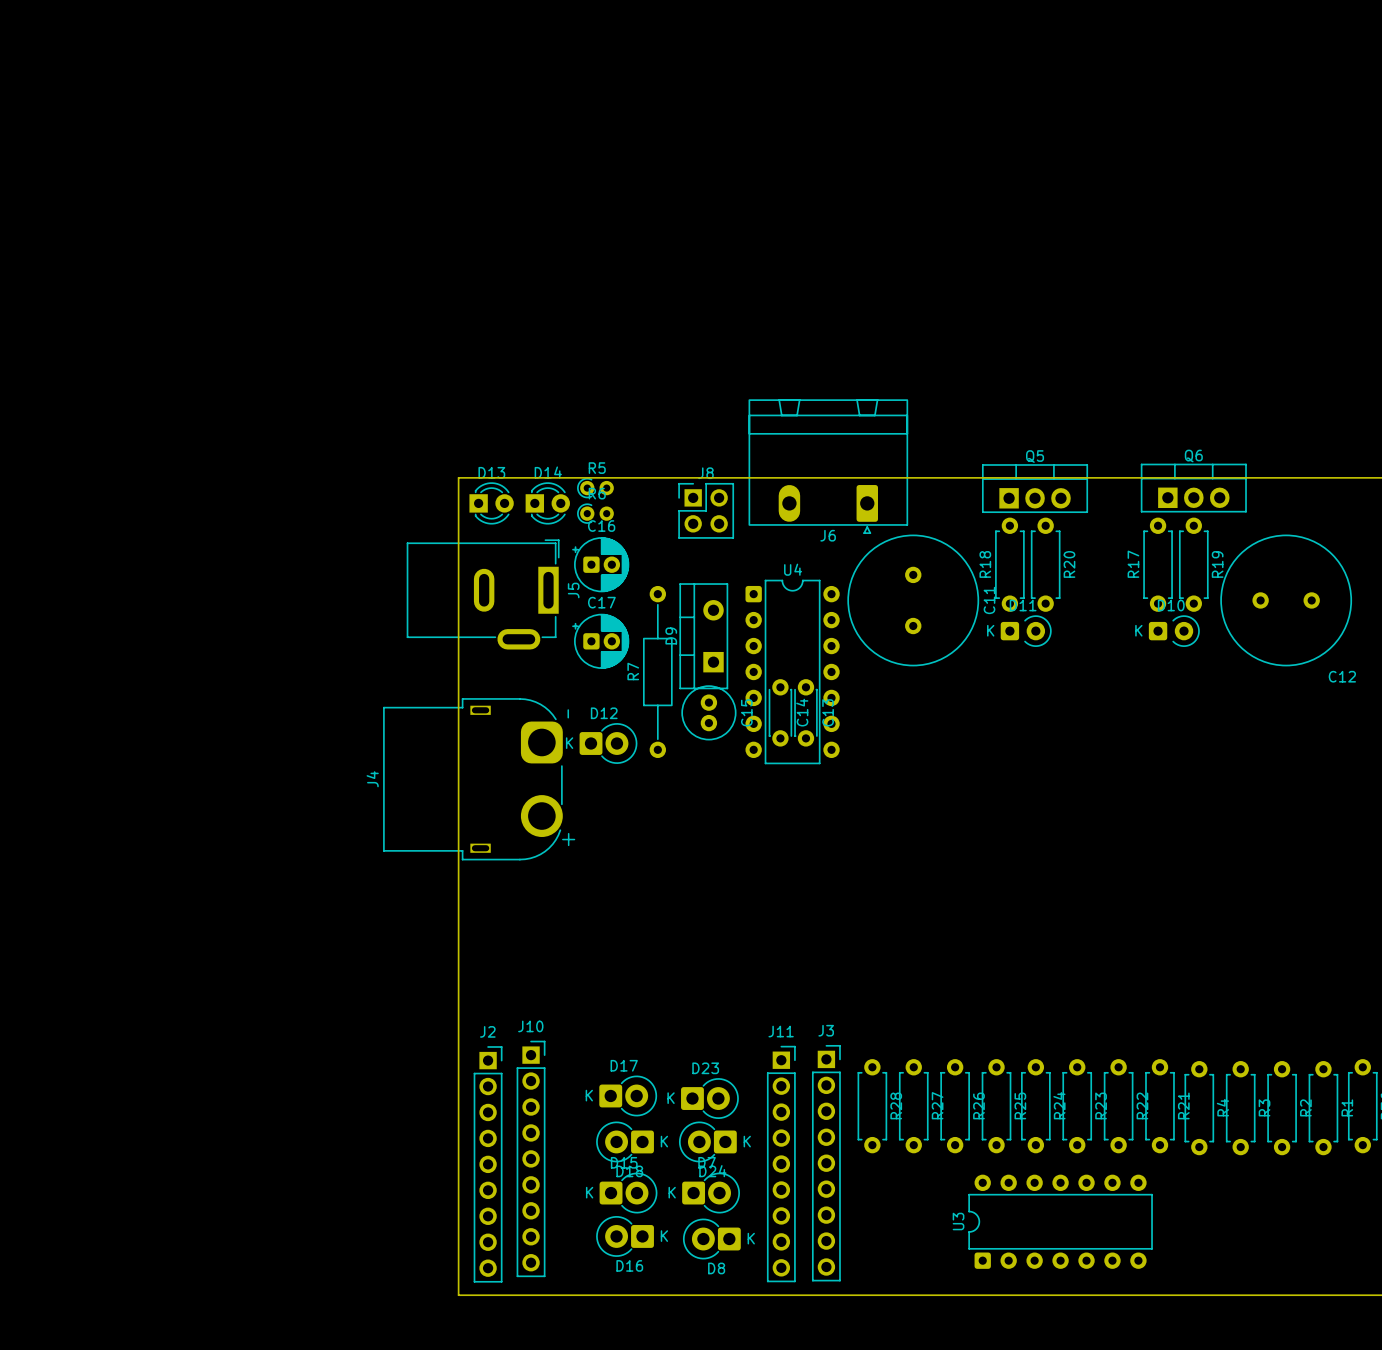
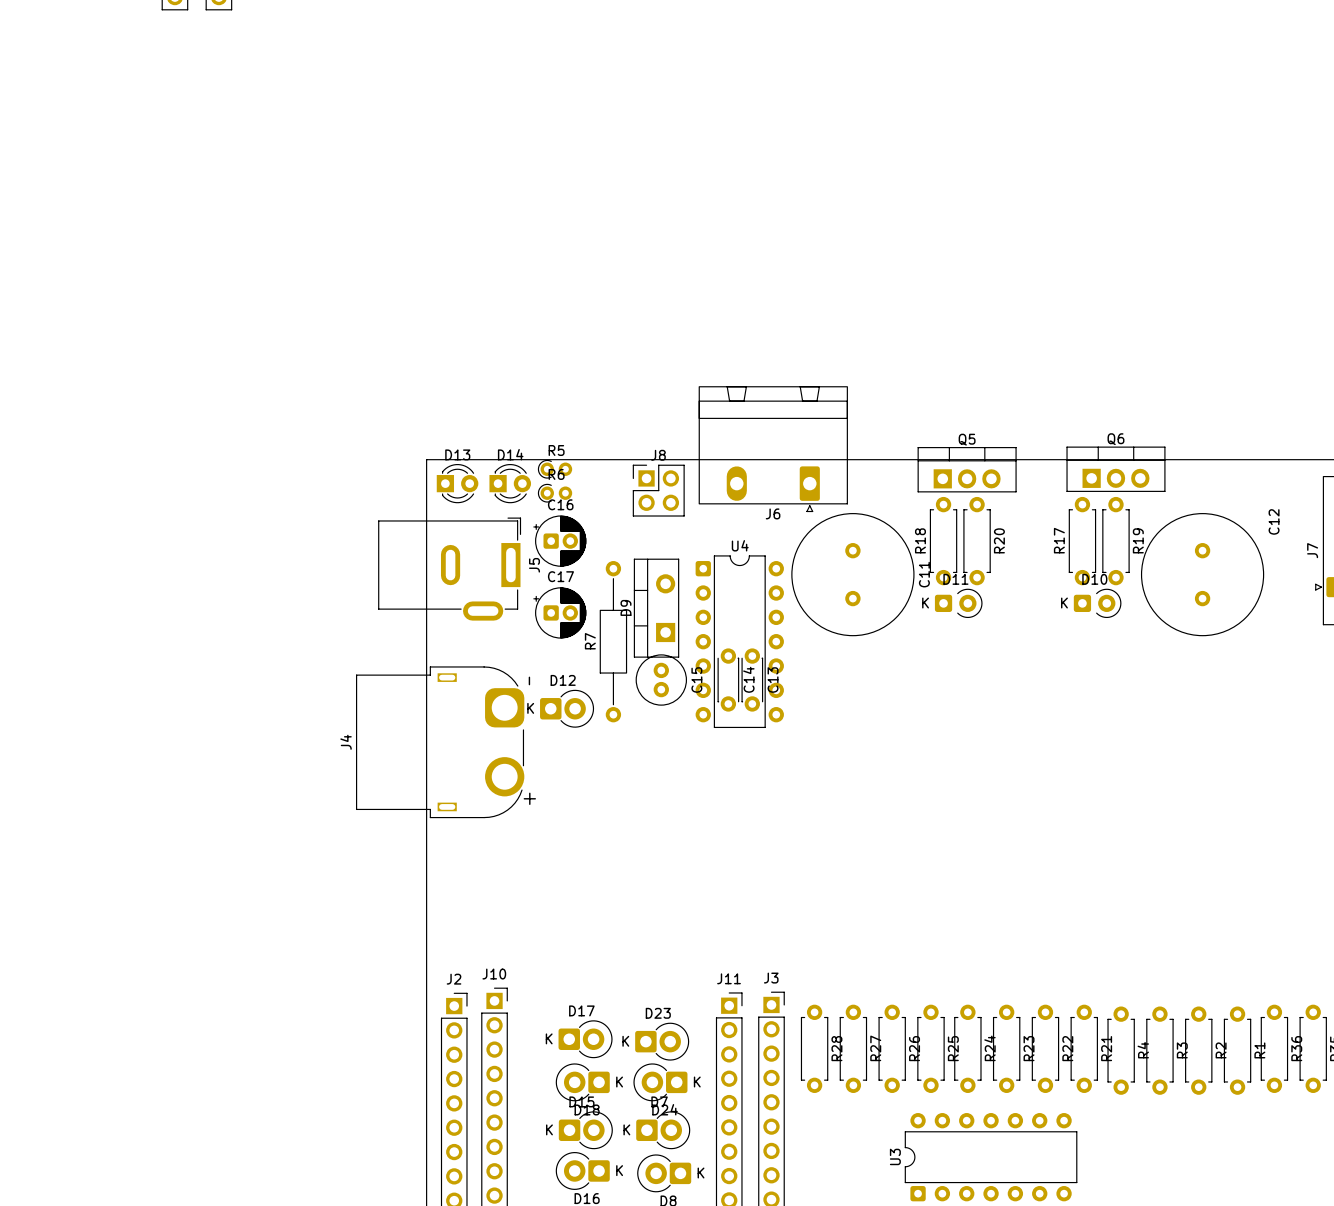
C12 rotation: 0° (1286, 600) -> 90° clockwise (1202, 574)
C12 name position: C12 (1342, 676) -> C12 (1274, 521)

